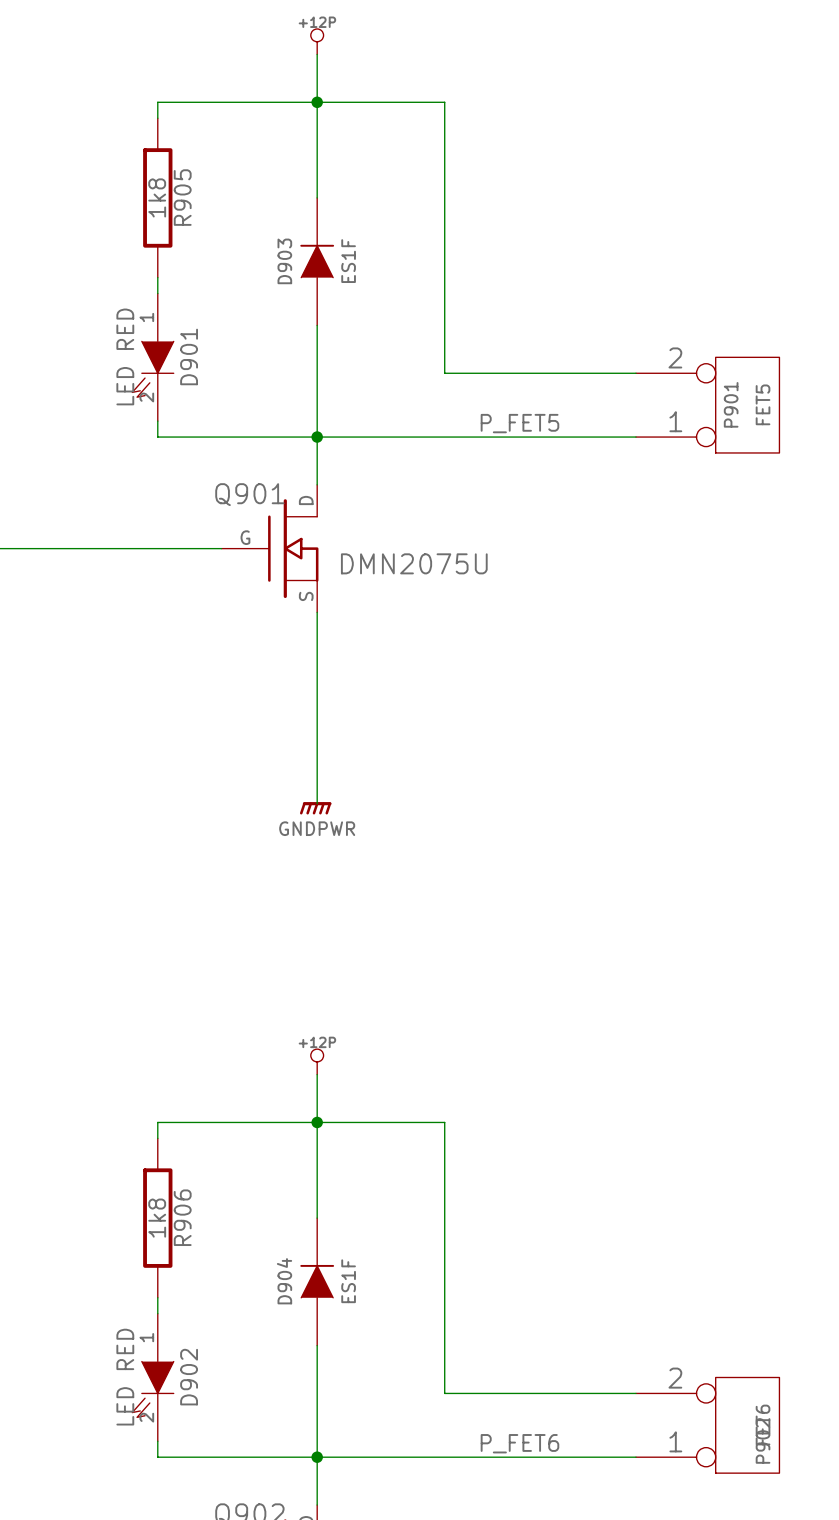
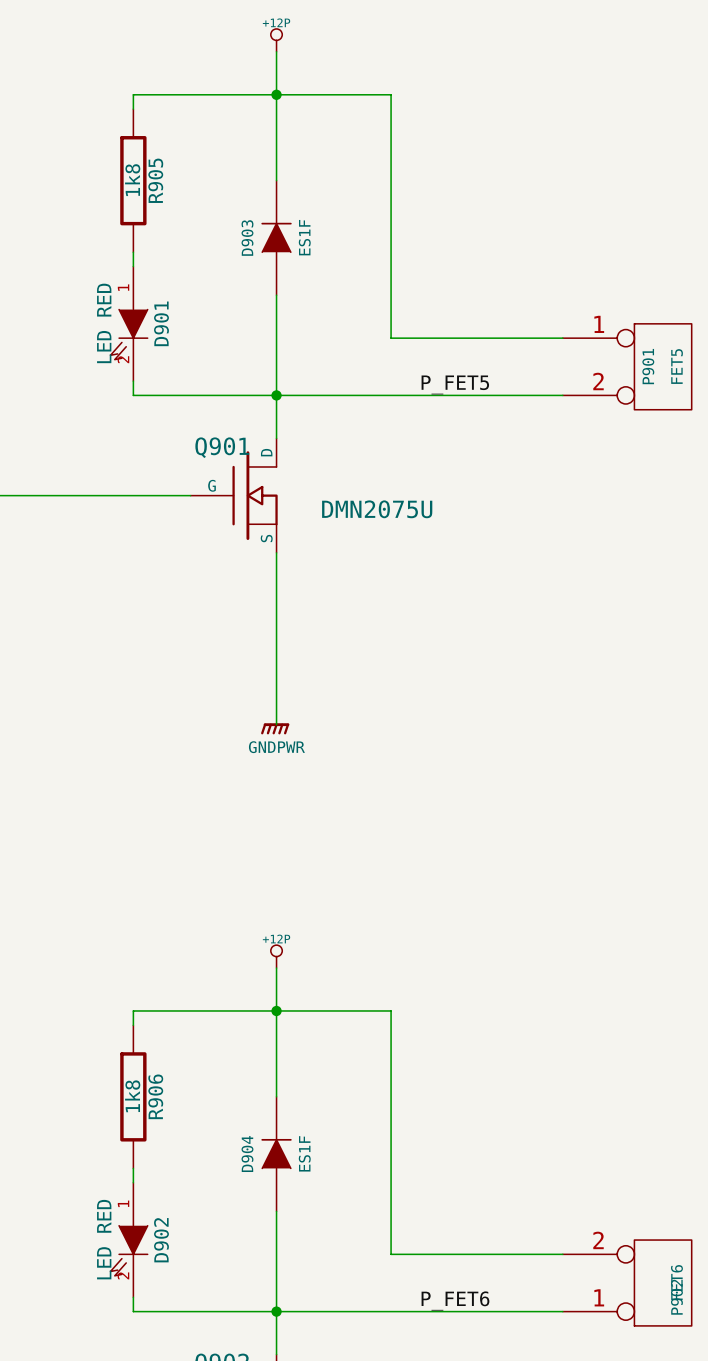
P901 flip: as is (747, 405) -> up-down (663, 366)

